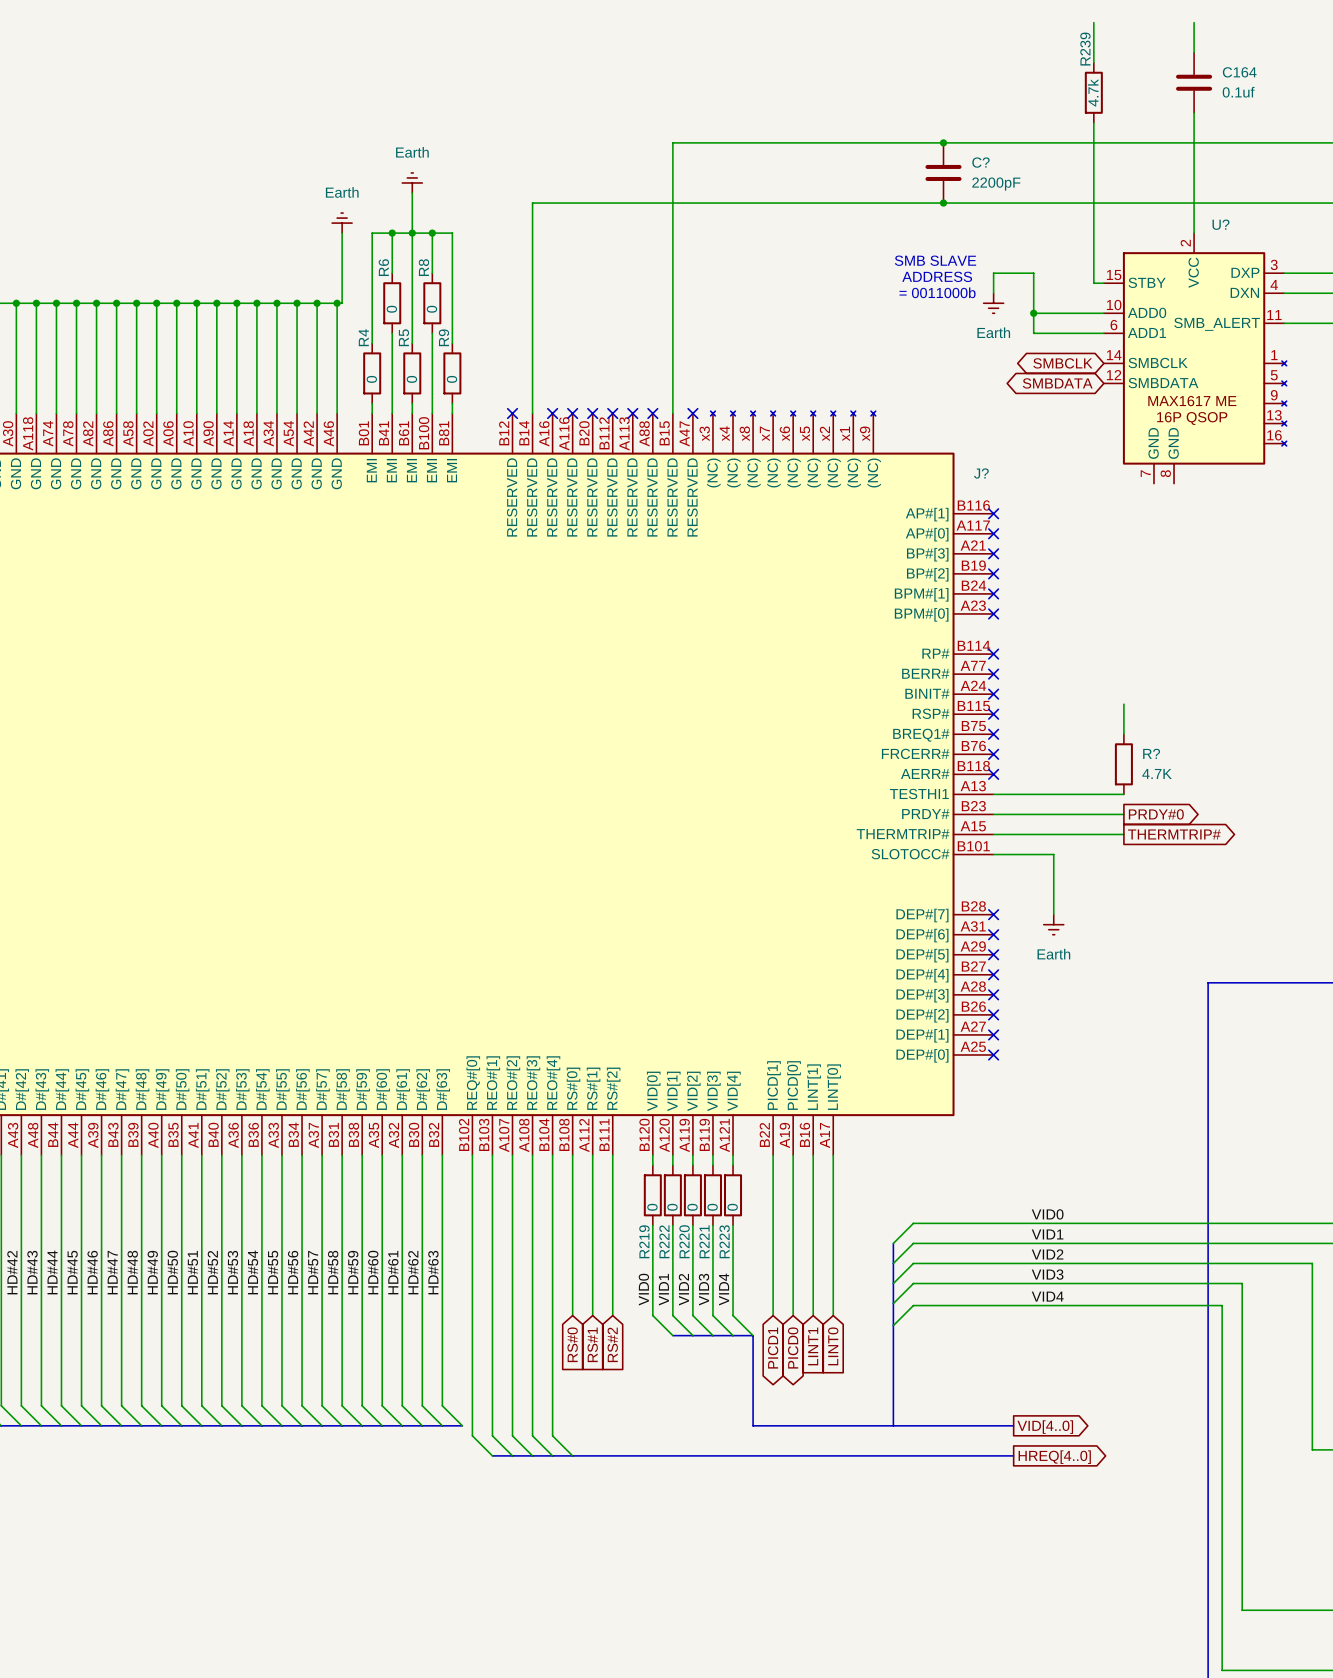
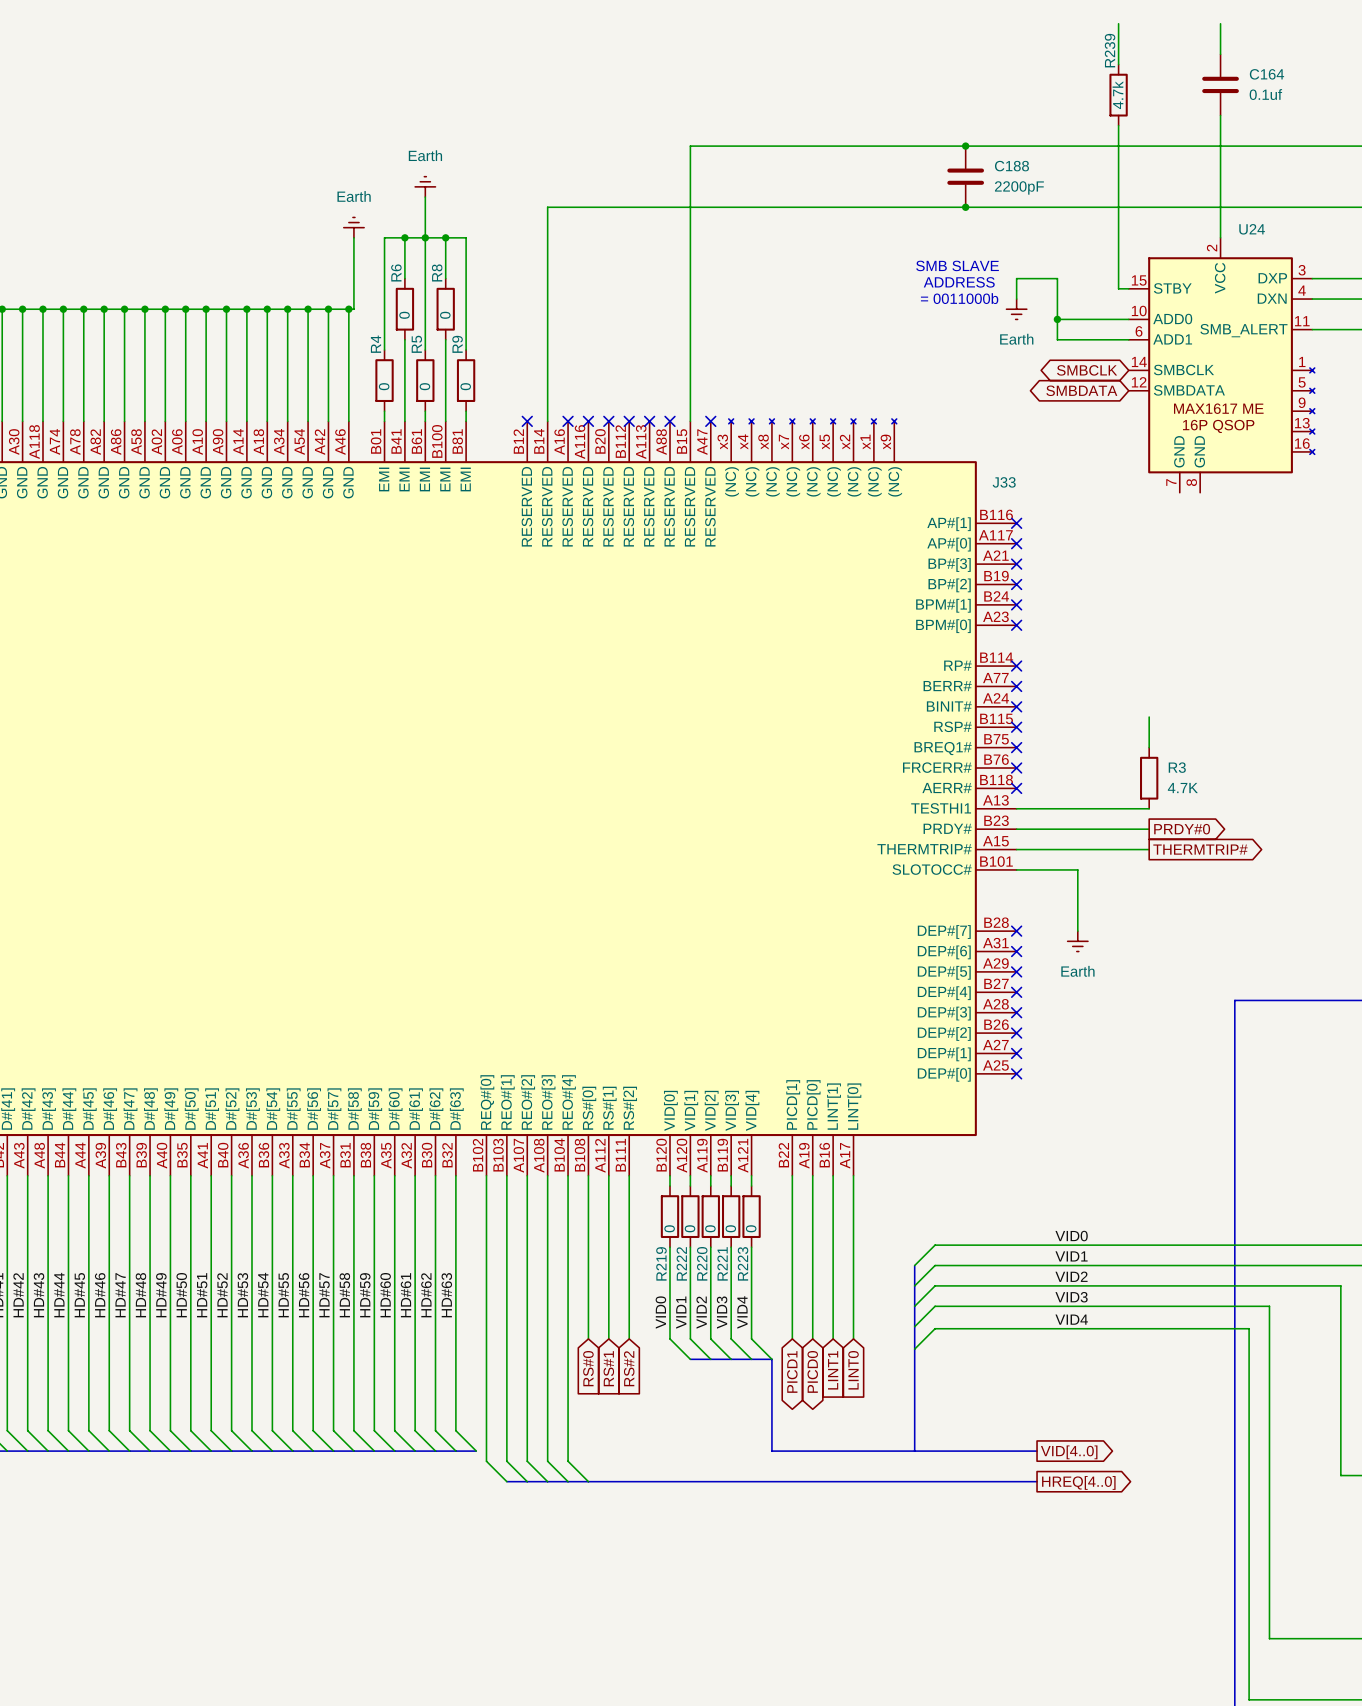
C? name: C? (980, 162) -> C188 (1011, 166)
U? name: U? (1220, 224) -> U24 (1252, 229)
J? name: J? (981, 473) -> J33 (1004, 482)
R? name: R? (1151, 753) -> R3 (1177, 767)

